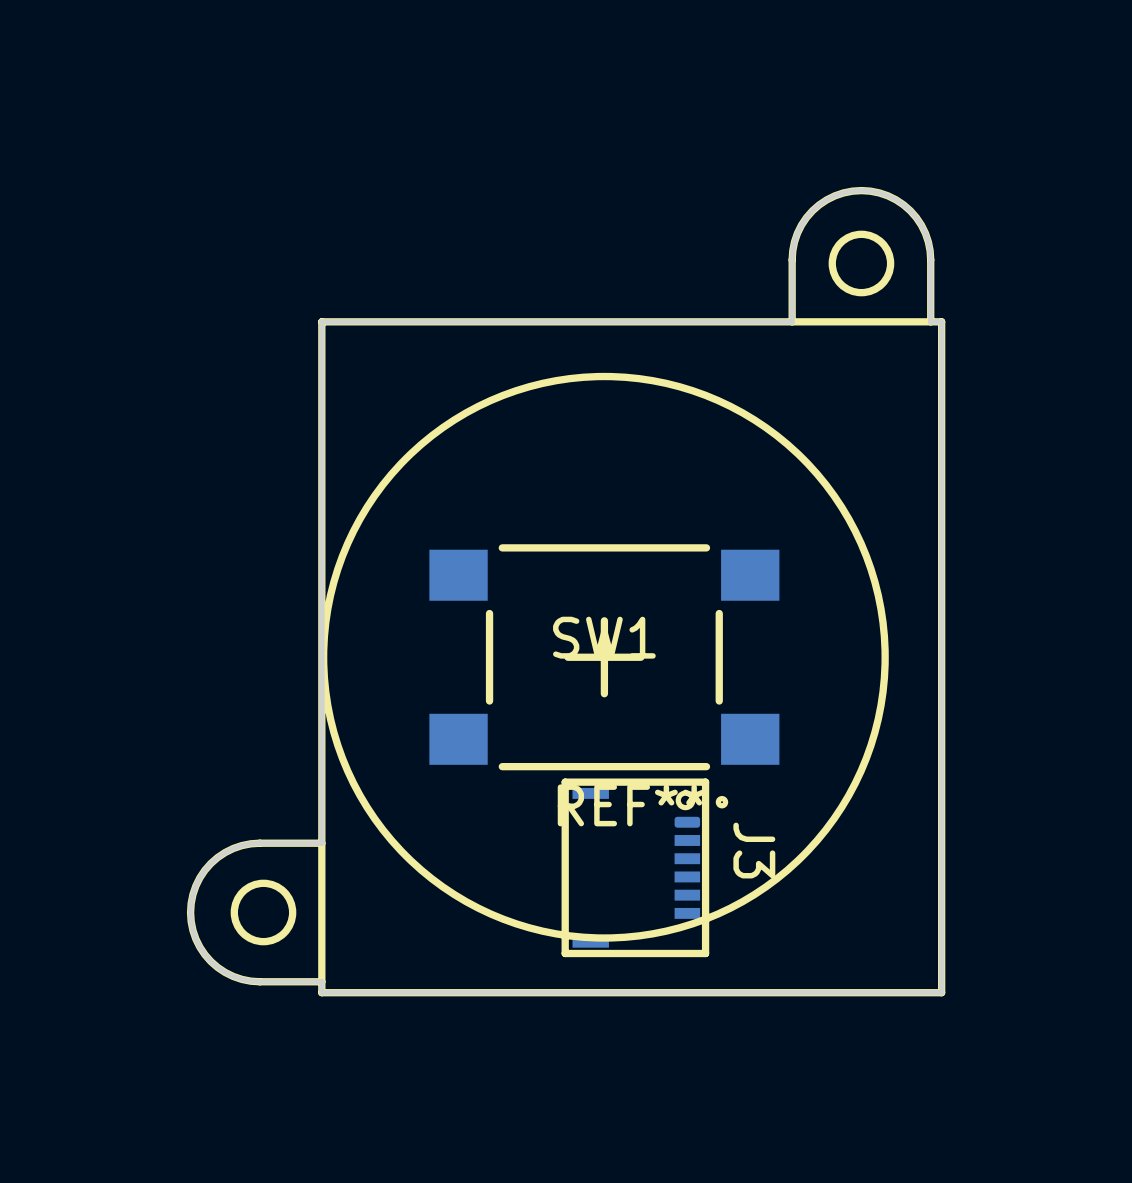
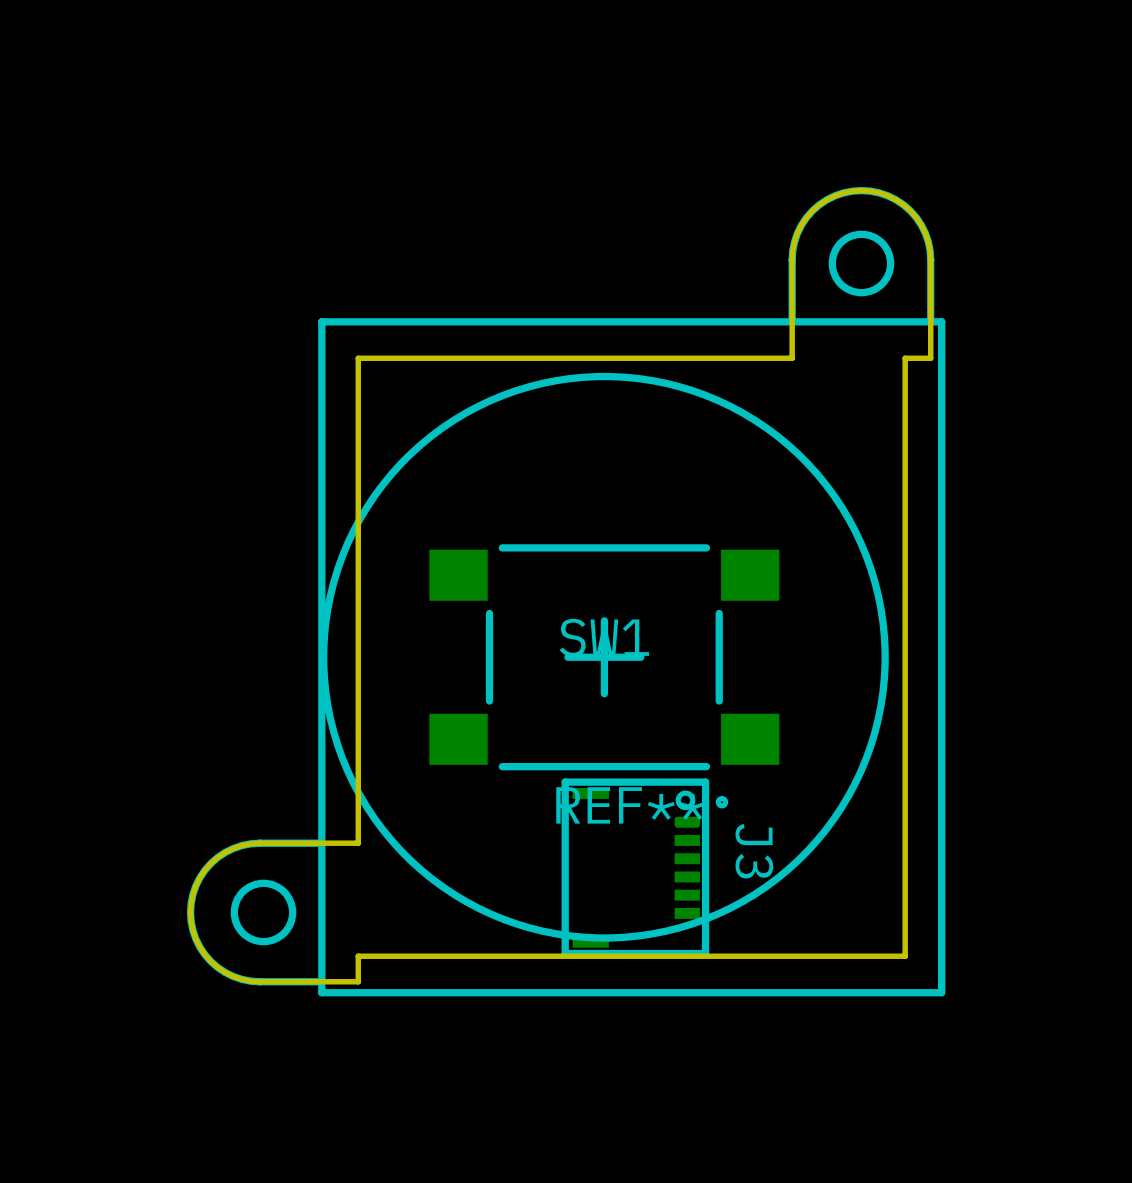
board edge: (792, 321) (321, 321) (321, 843) -> (792, 321) (792, 358) (358, 358) (358, 843) (321, 843)
board edge: (930, 321) (941, 321) (941, 992) (321, 992) (321, 981) -> (930, 321) (930, 358) (905, 358) (905, 956) (358, 956) (358, 981) (321, 981)

